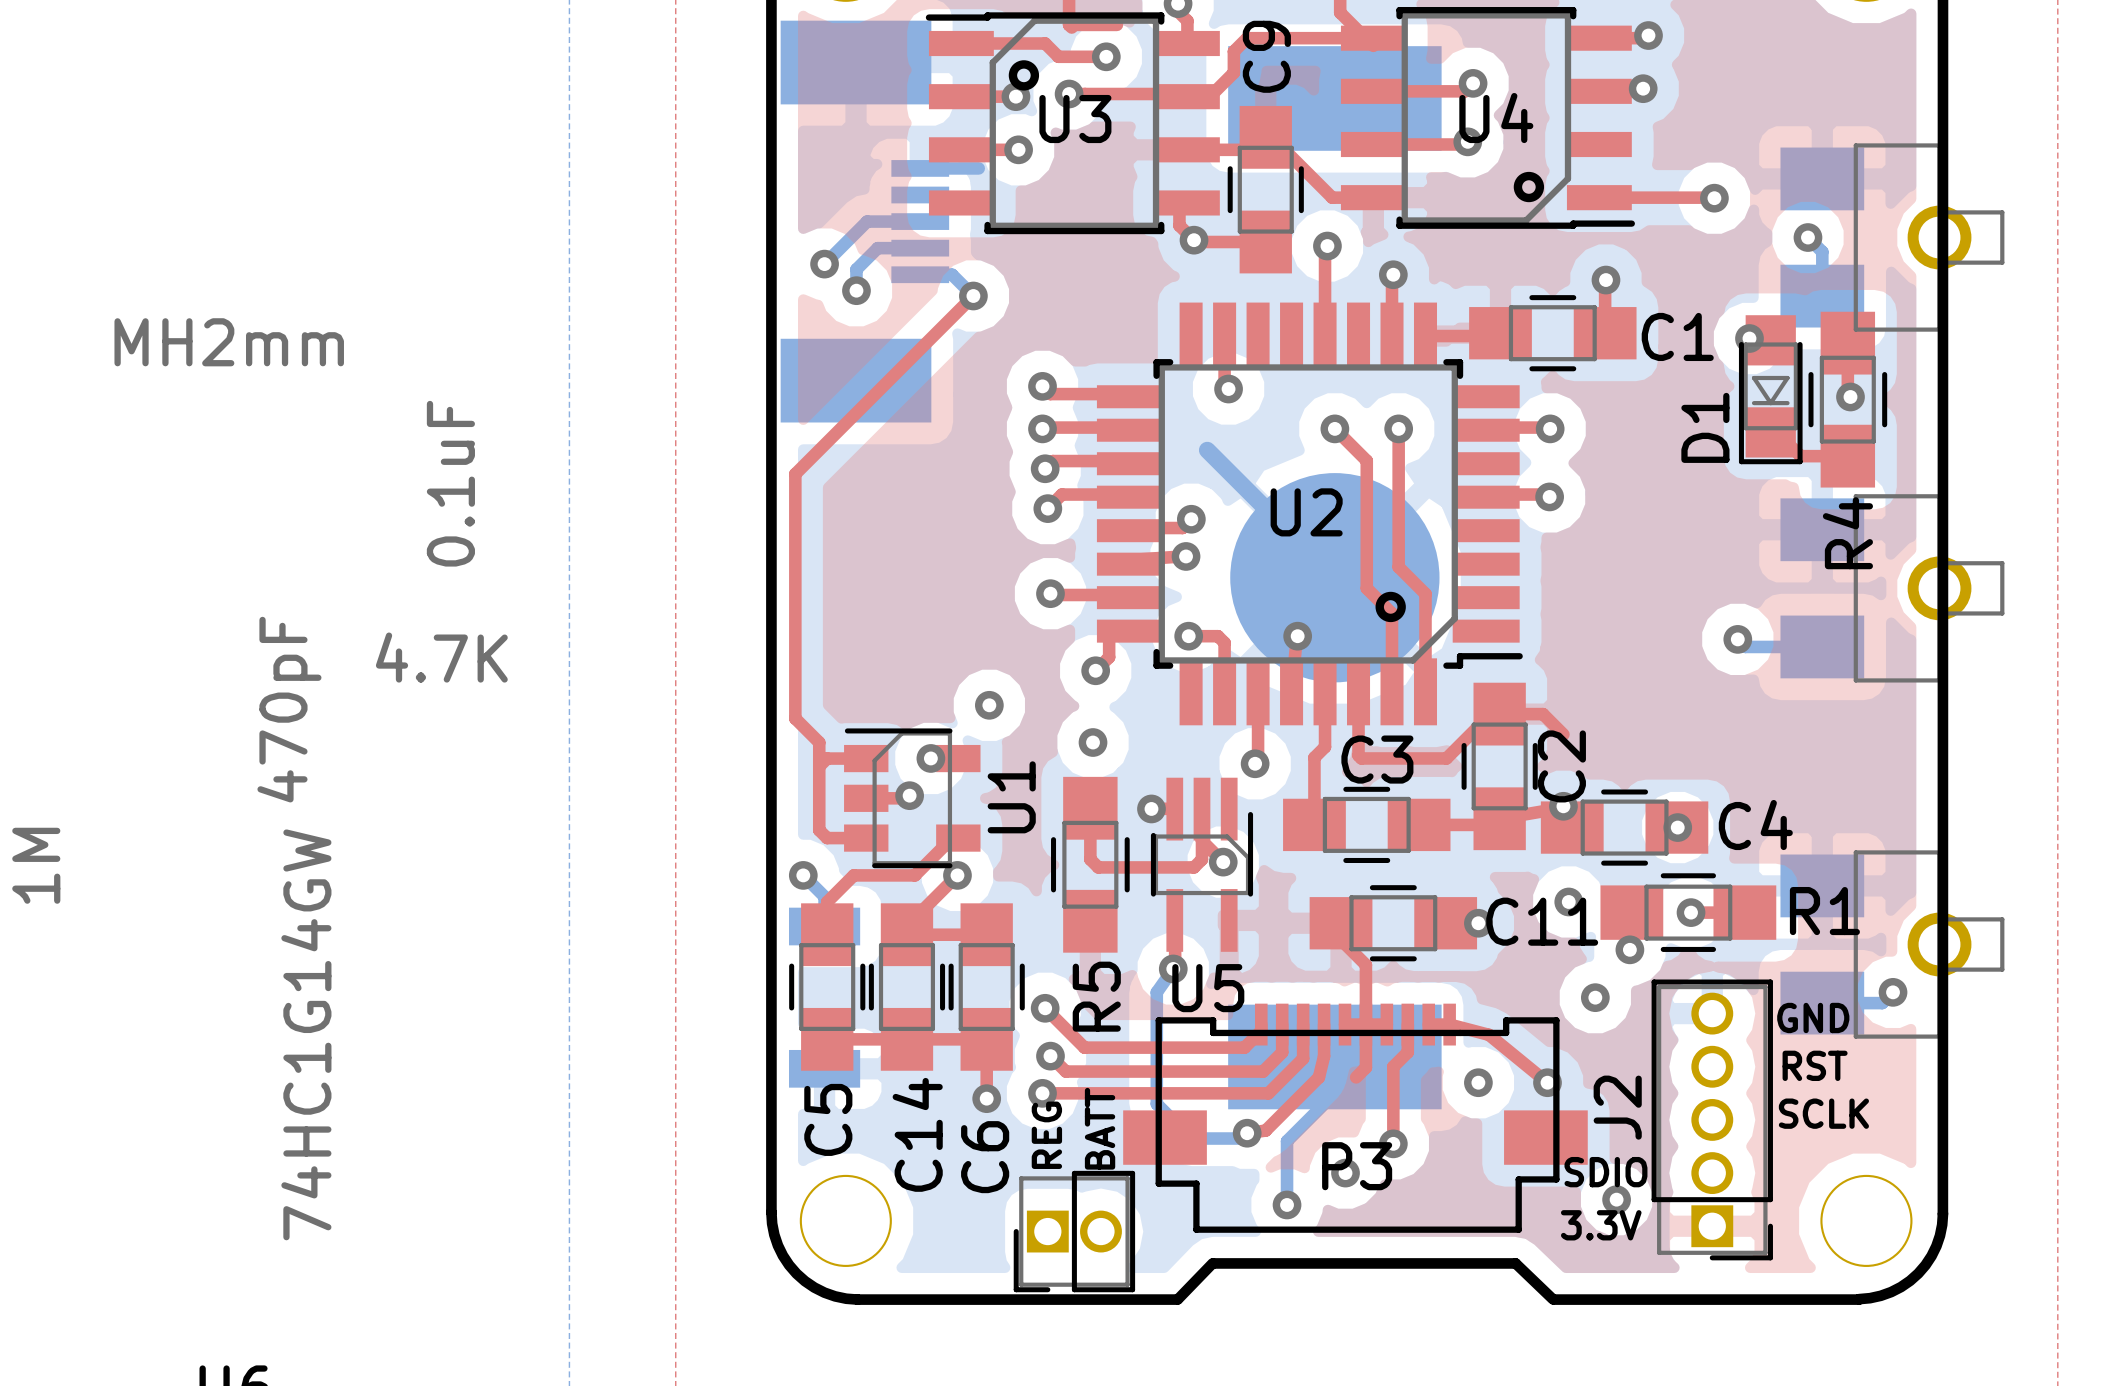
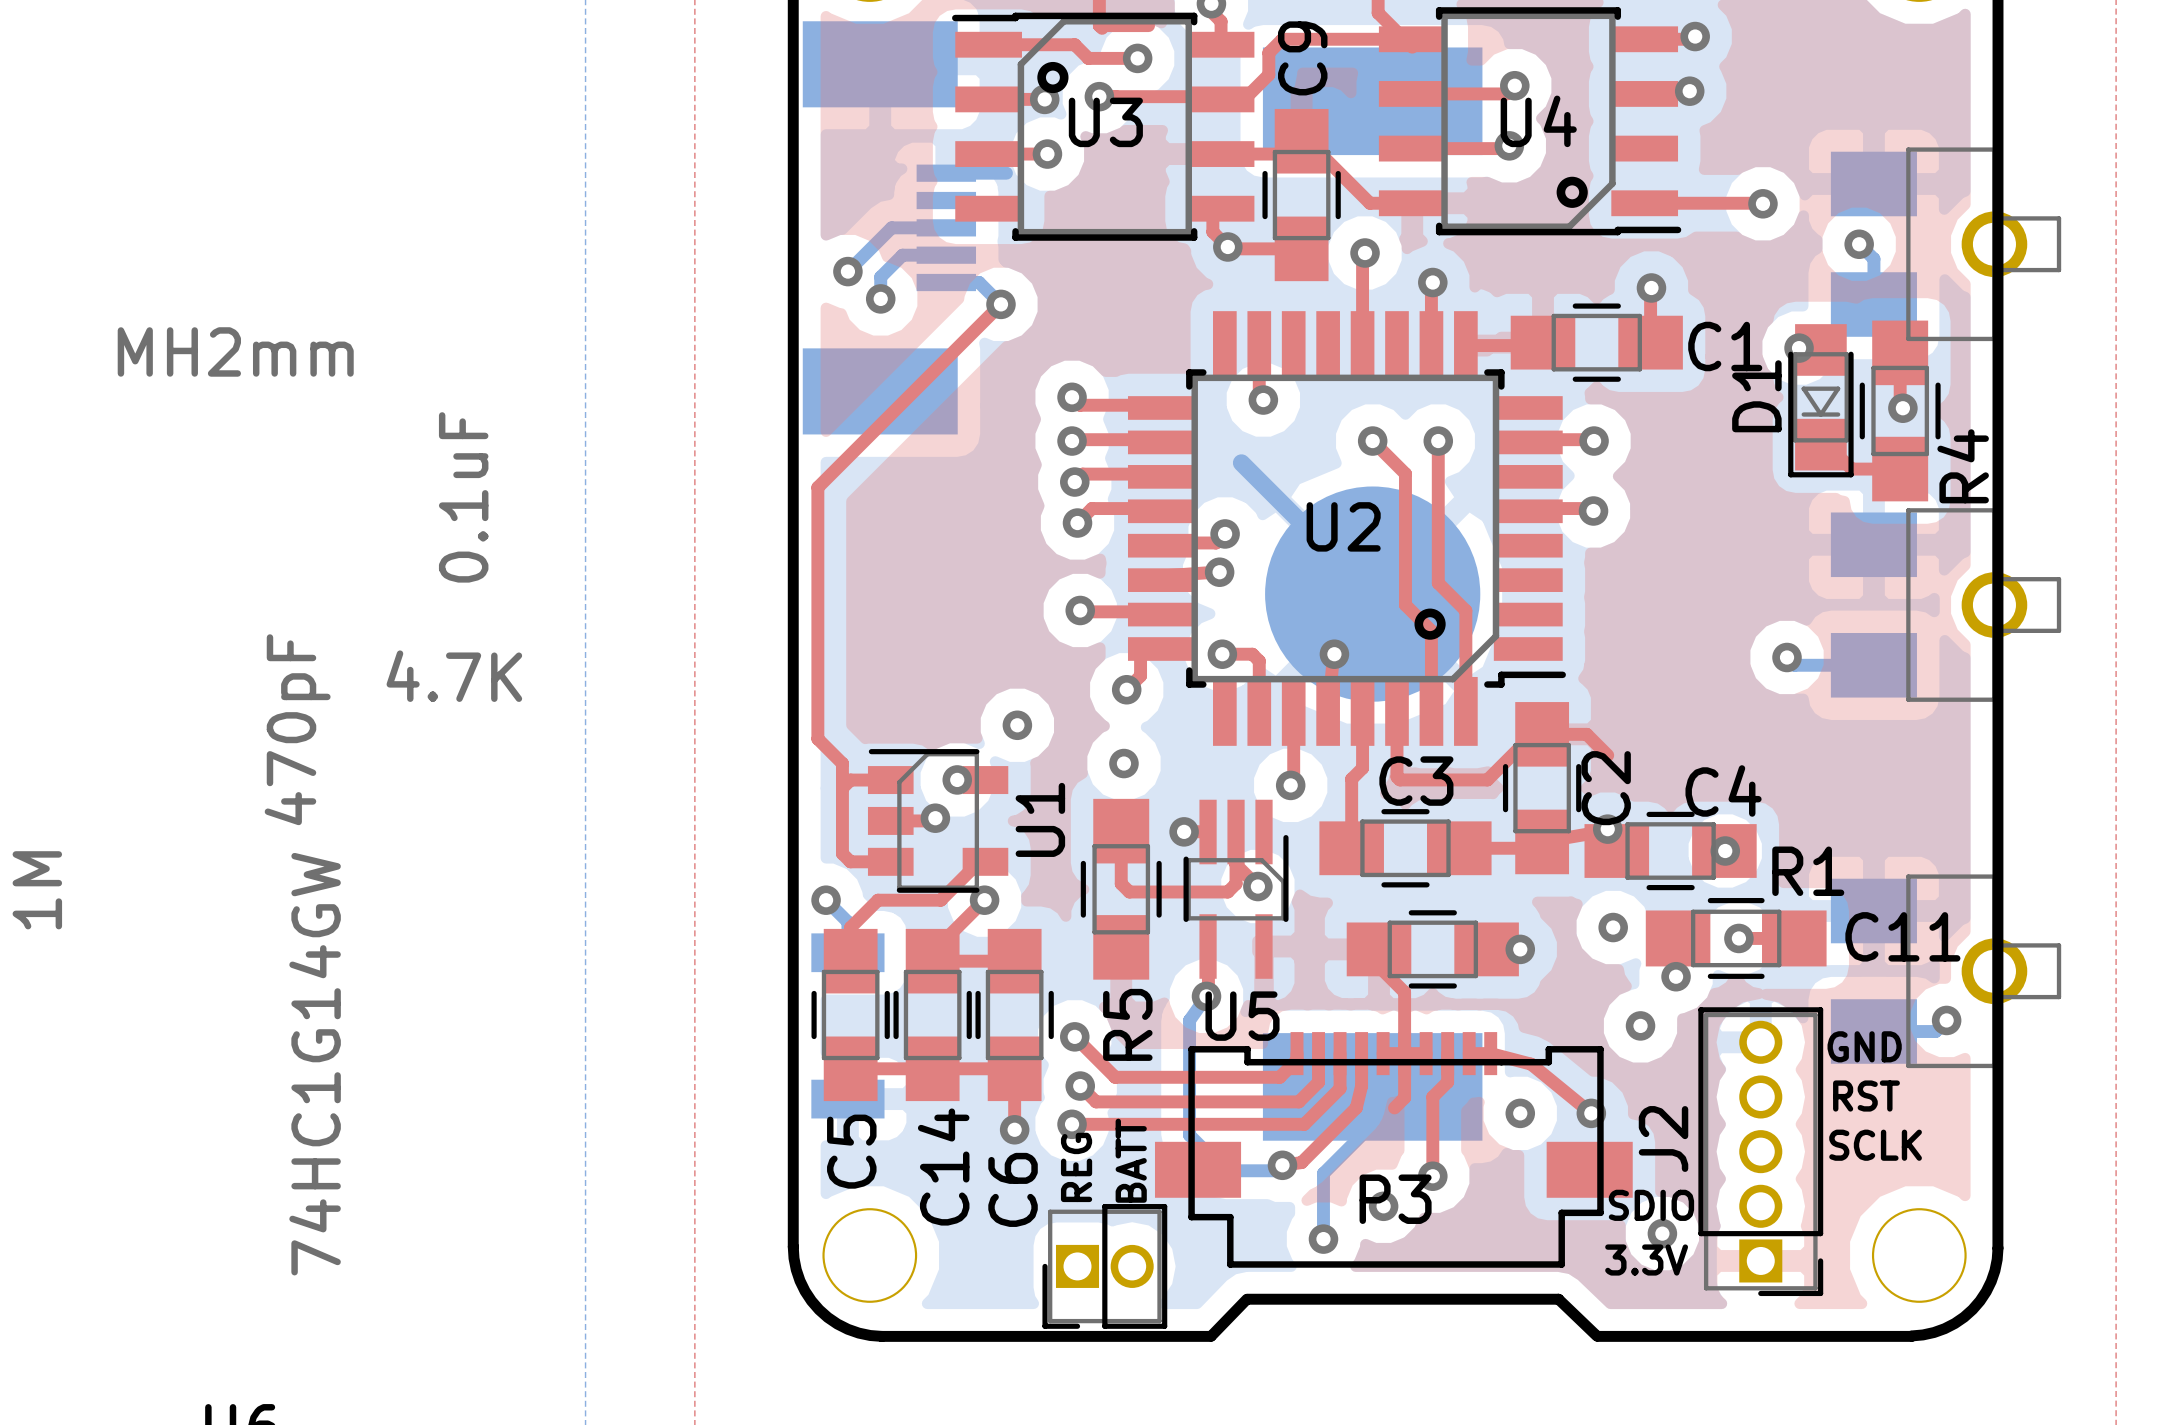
D1 name position: D1 (1705, 427) -> D1 (1756, 396)
R4 name position: R4 (1847, 533) -> R4 (1963, 466)
C4 name position: C4 (1755, 825) -> C4 (1723, 790)
R1 name position: R1 (1824, 911) -> R1 (1808, 871)
C11 name position: C11 (1542, 921) -> C11 (1902, 936)

